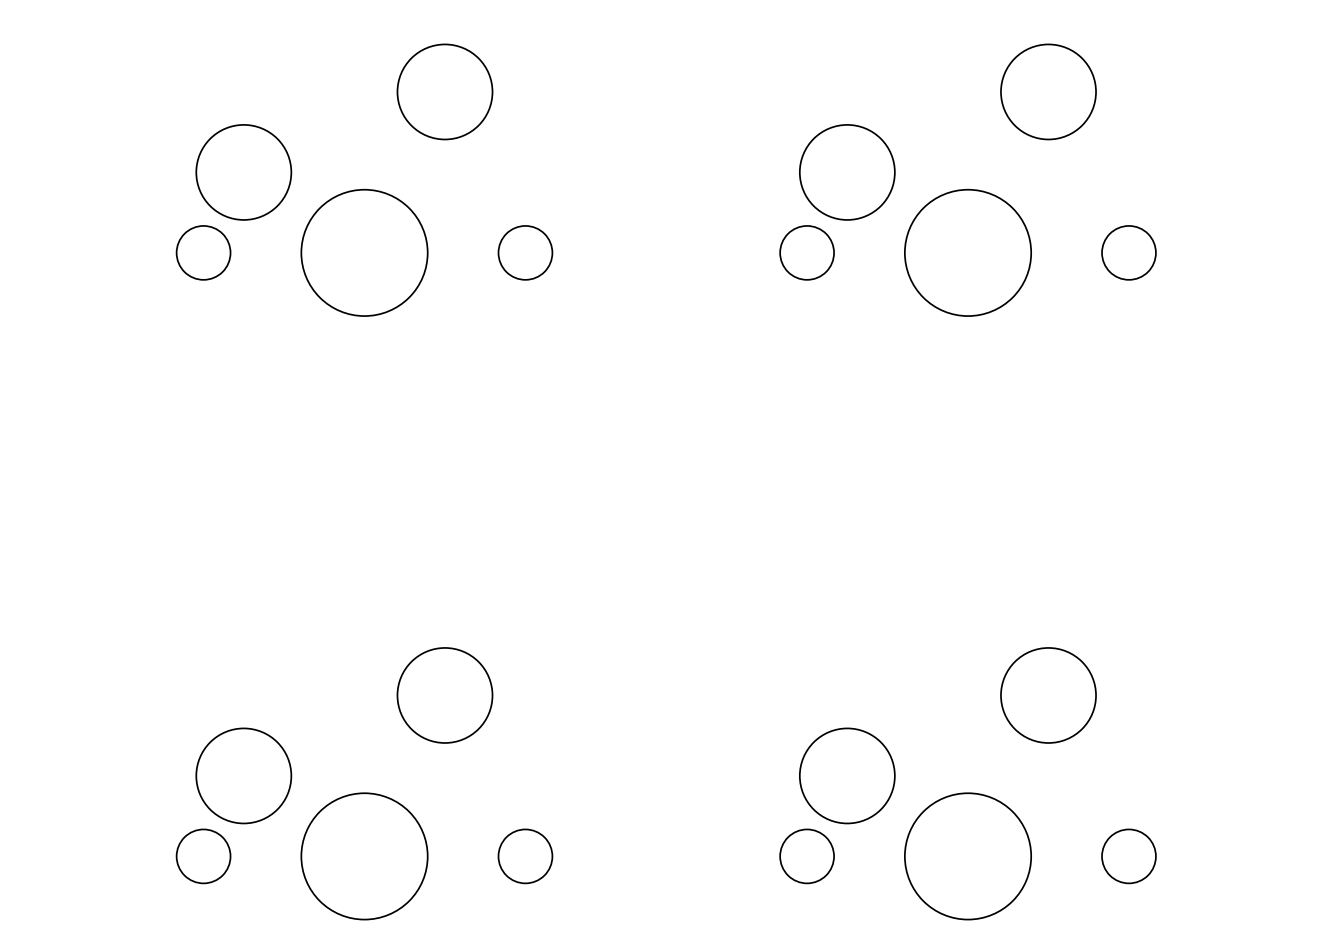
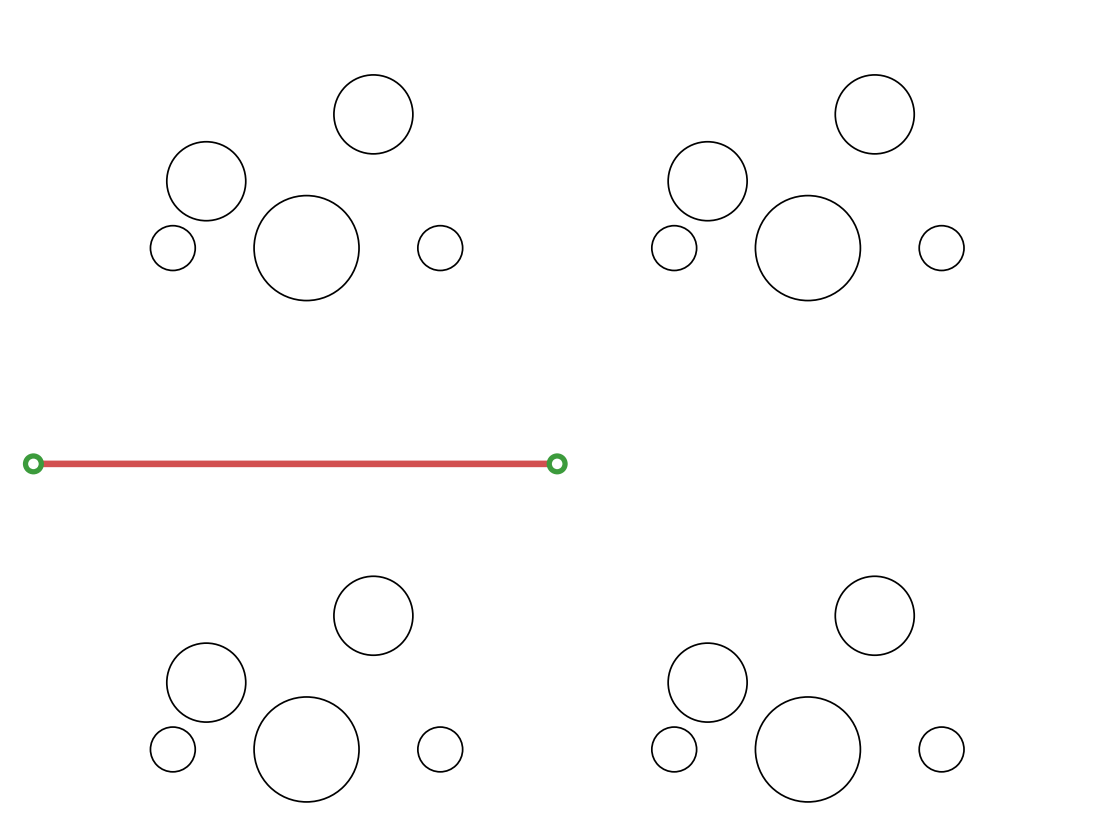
track: none -> (33, 463) (557, 463)
via: none -> (33, 463)
via: none -> (557, 463)

